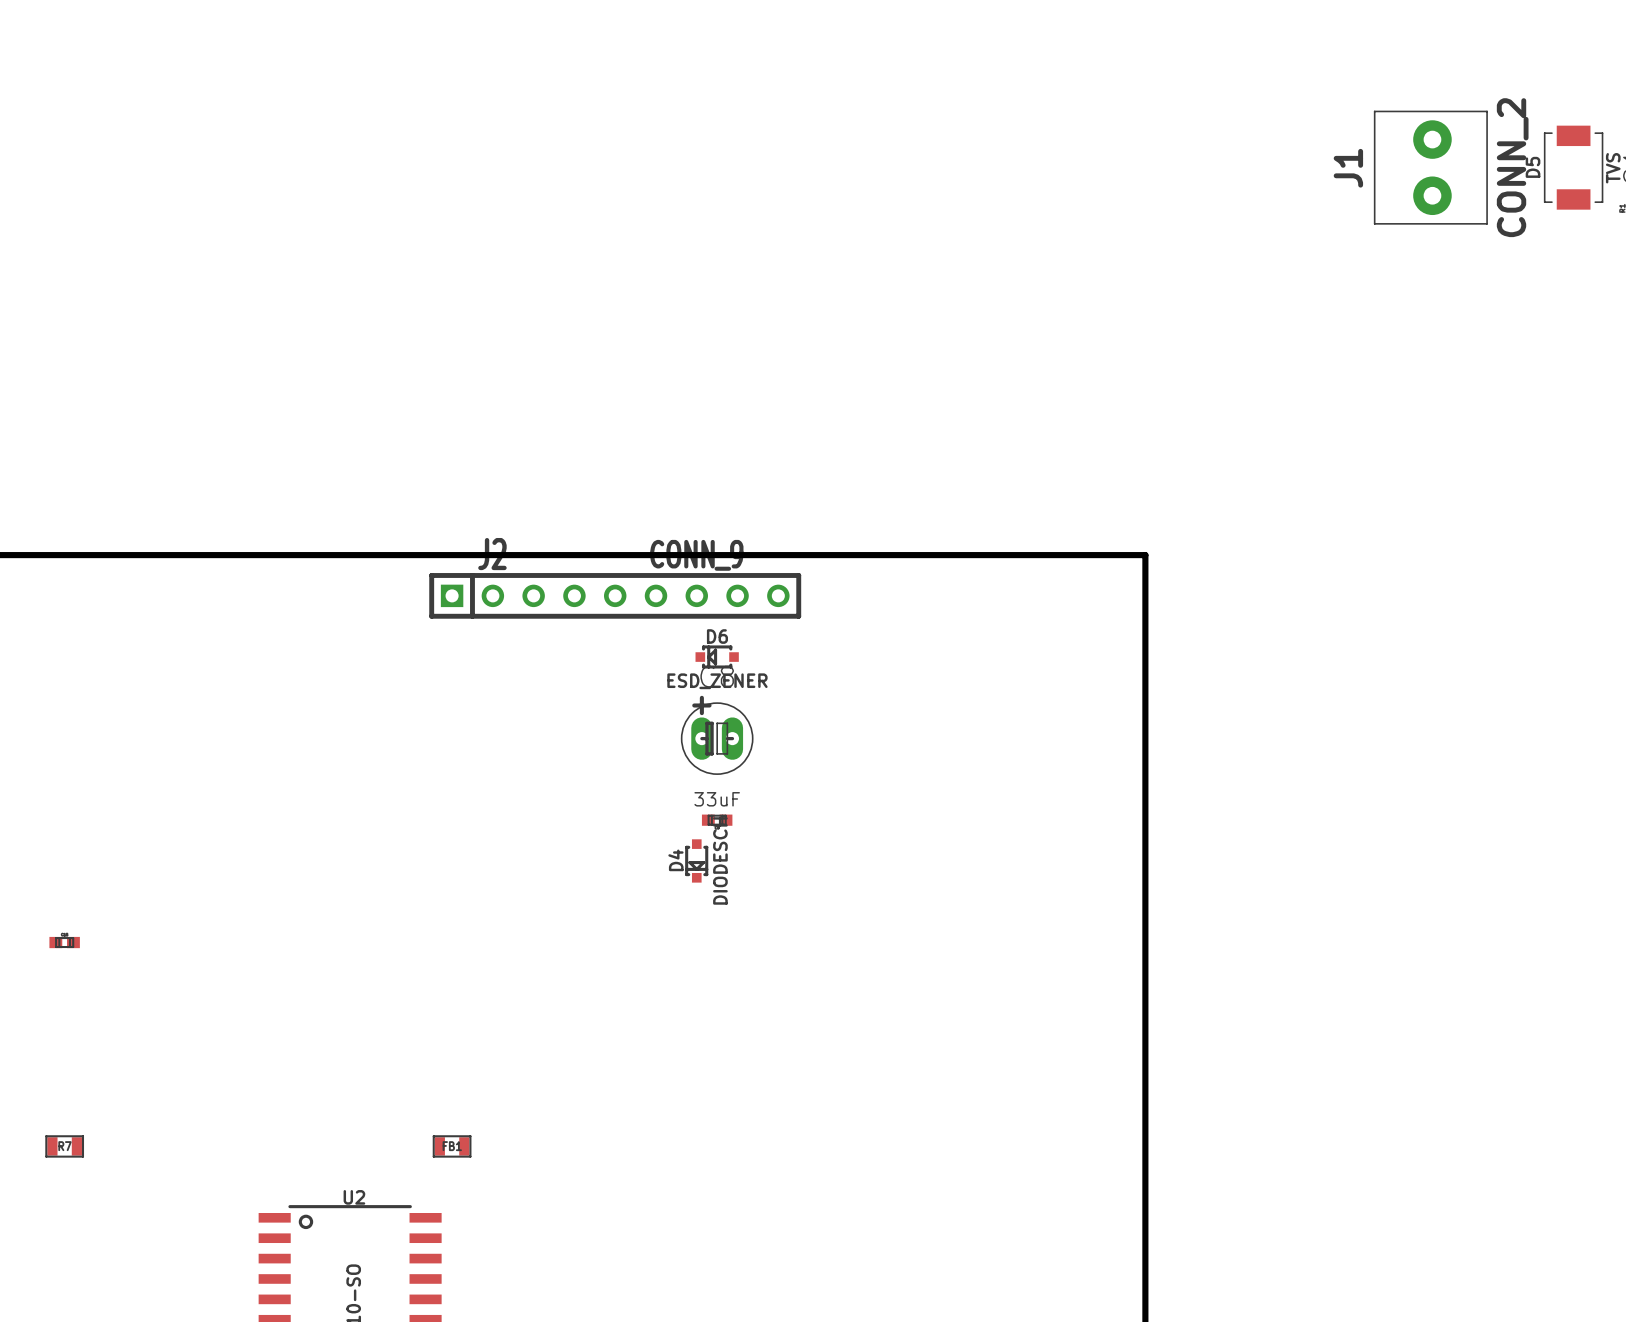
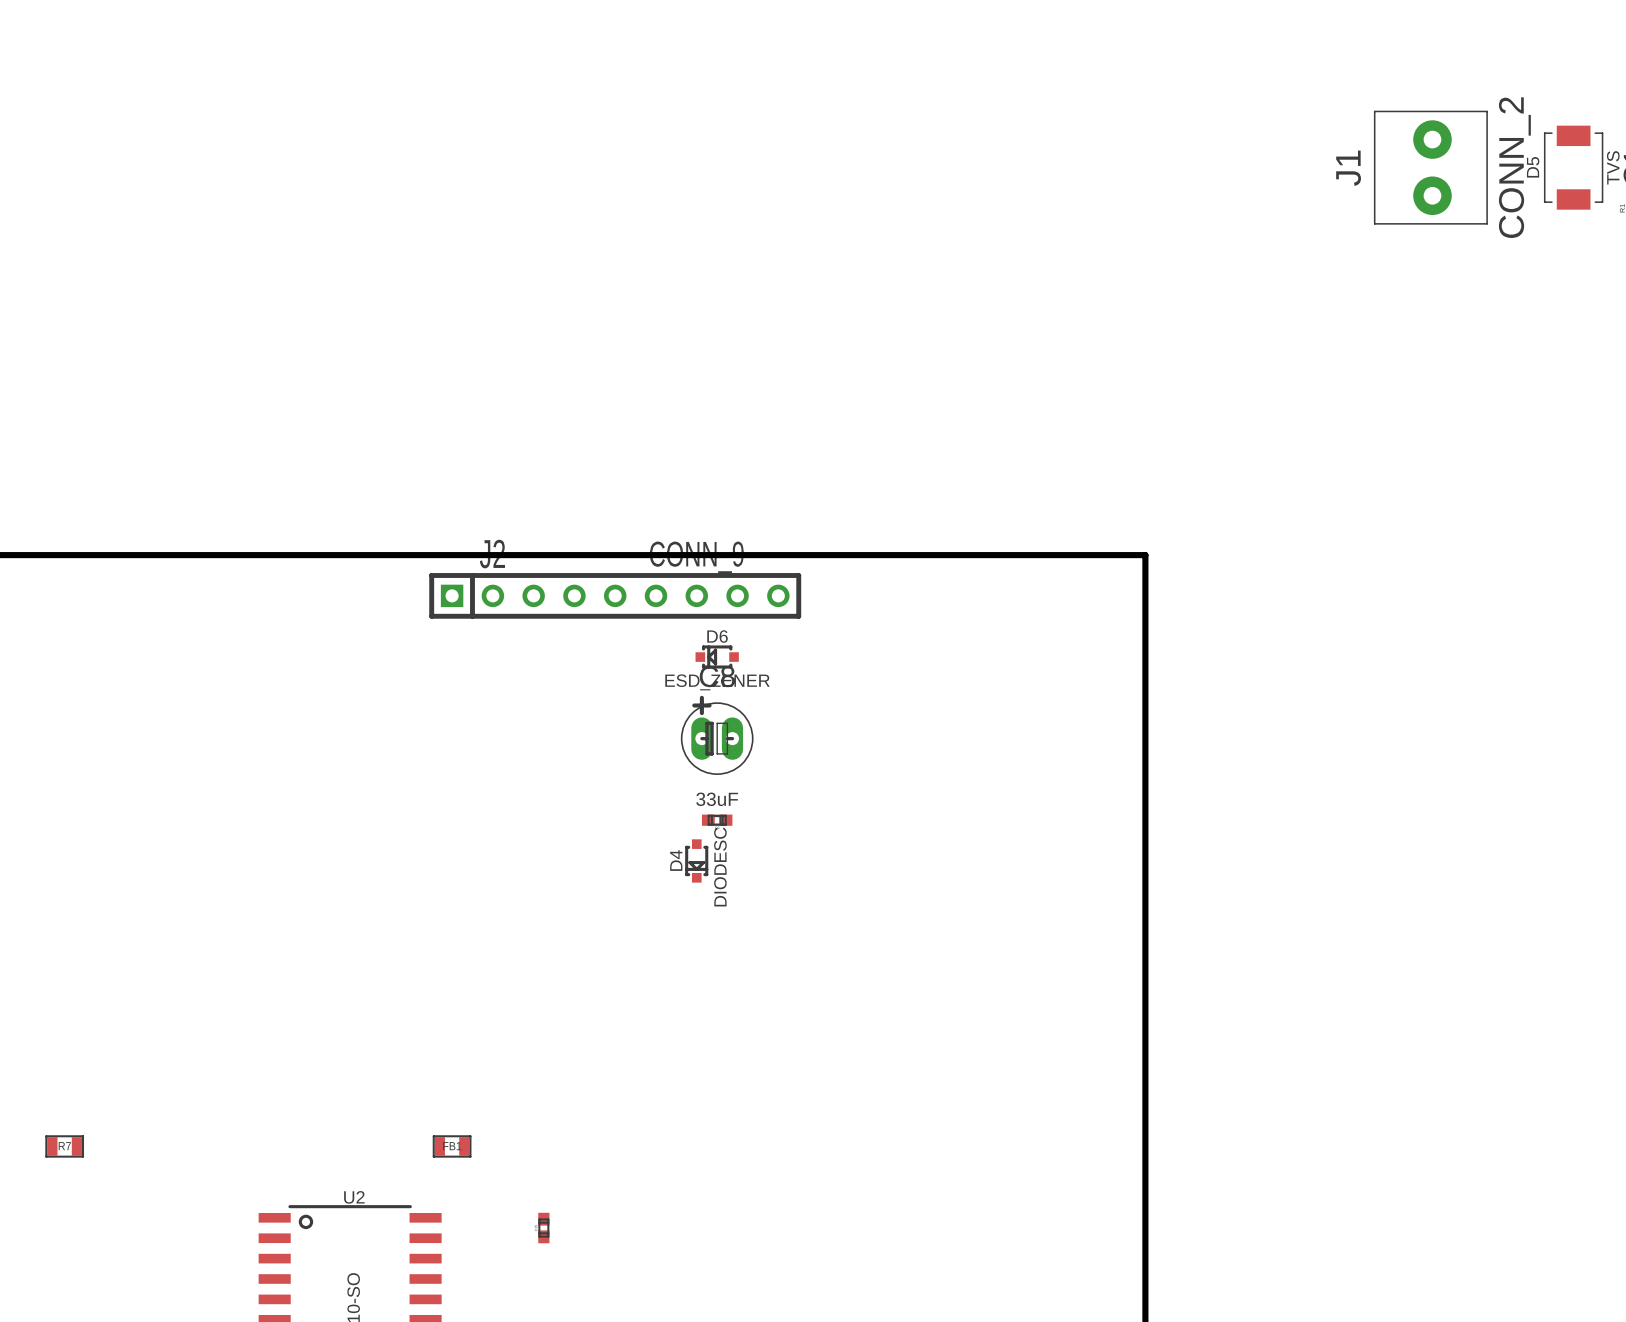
part rotation: 0° (64, 942) -> 90° clockwise (543, 1228)
part position: (64, 942) -> (543, 1228)

